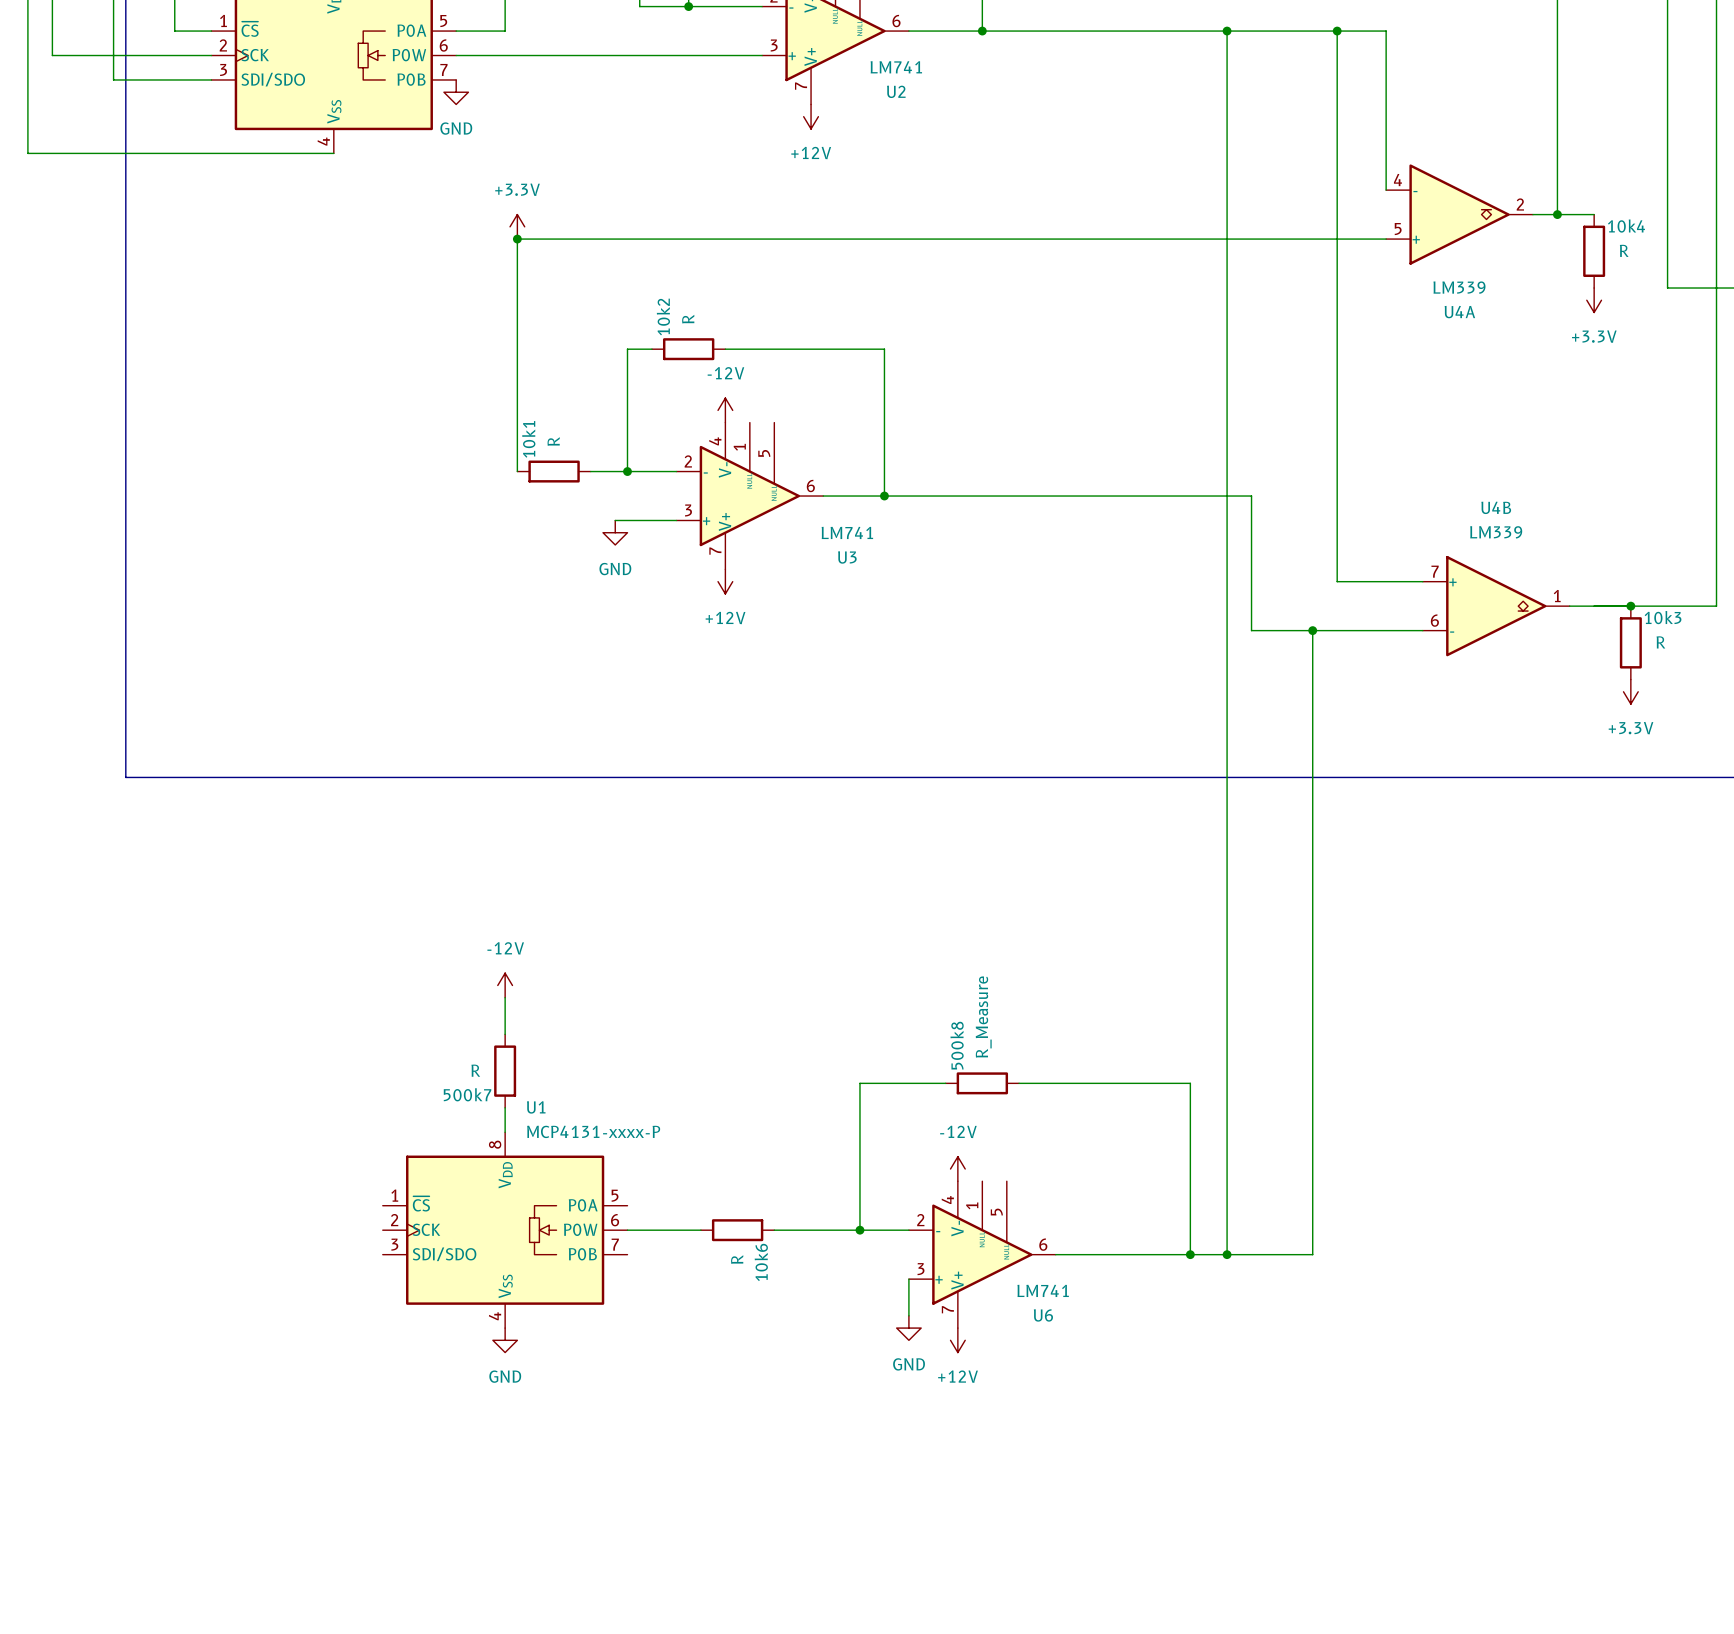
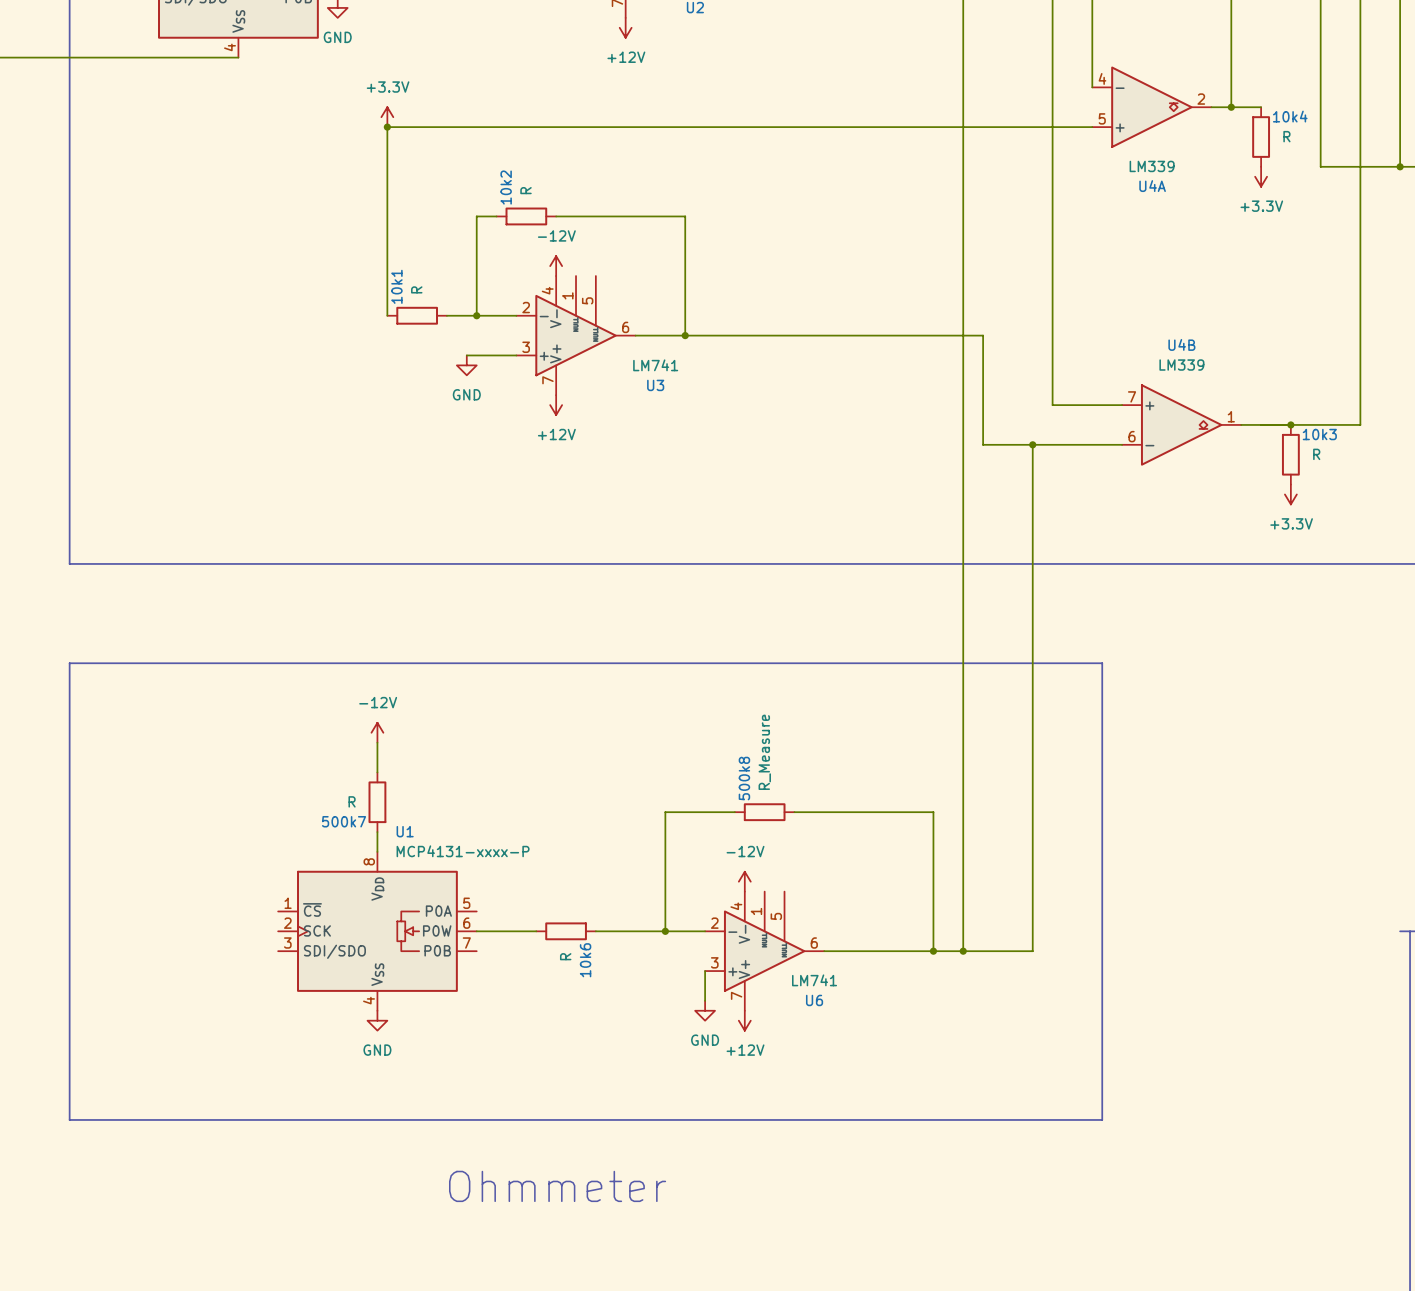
line: none -> (69, 663) (1102, 663) (1102, 1119) (69, 1119) (69, 663)
text: none -> Ohmmeter (557, 1186)

